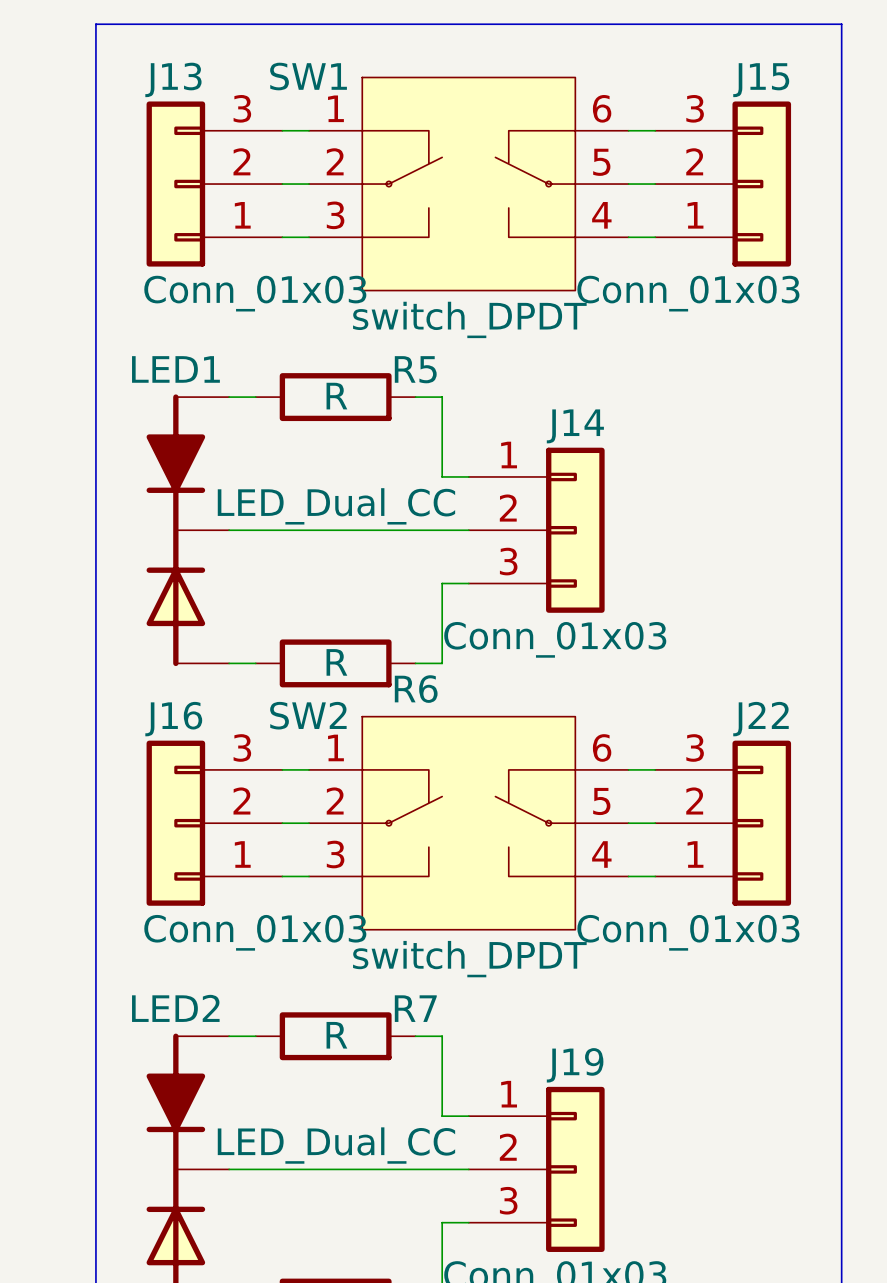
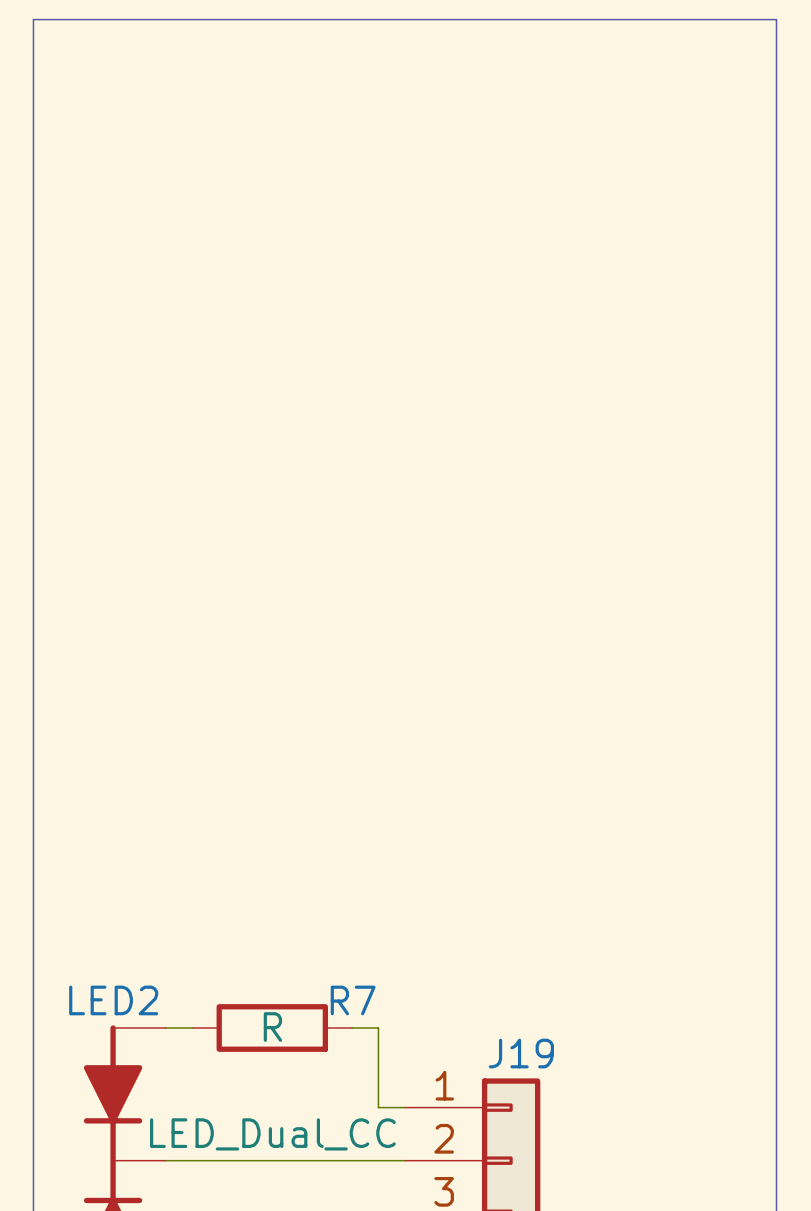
wire: (282, 130) (309, 130) -> none
wire: (628, 130) (655, 130) -> none
J13: Conn_01x03 (214, 184) -> none
wire: (282, 184) (309, 184) -> none
SW1: switch_DPDT (468, 184) -> none
wire: (628, 184) (655, 184) -> none
J15: Conn_01x03 (723, 184) -> none
wire: (282, 237) (309, 237) -> none
wire: (628, 237) (655, 237) -> none
wire: (229, 397) (255, 397) -> none
R5: R (335, 397) -> none
wire: (415, 397) (442, 397) (442, 476) (468, 476) -> none
LED1: LED_Dual_CC (187, 530) -> none
wire: (229, 530) (468, 530) -> none
J14: Conn_01x03 (536, 530) -> none
wire: (468, 583) (442, 583) (442, 663) (415, 663) -> none
wire: (229, 663) (255, 663) -> none
R6: R (335, 663) -> none
wire: (282, 769) (309, 769) -> none
wire: (628, 769) (655, 769) -> none
J16: Conn_01x03 (214, 823) -> none
wire: (282, 823) (309, 823) -> none
SW2: switch_DPDT (468, 823) -> none
wire: (628, 823) (655, 823) -> none
J22: Conn_01x03 (723, 823) -> none
wire: (282, 876) (309, 876) -> none
wire: (628, 876) (655, 876) -> none

